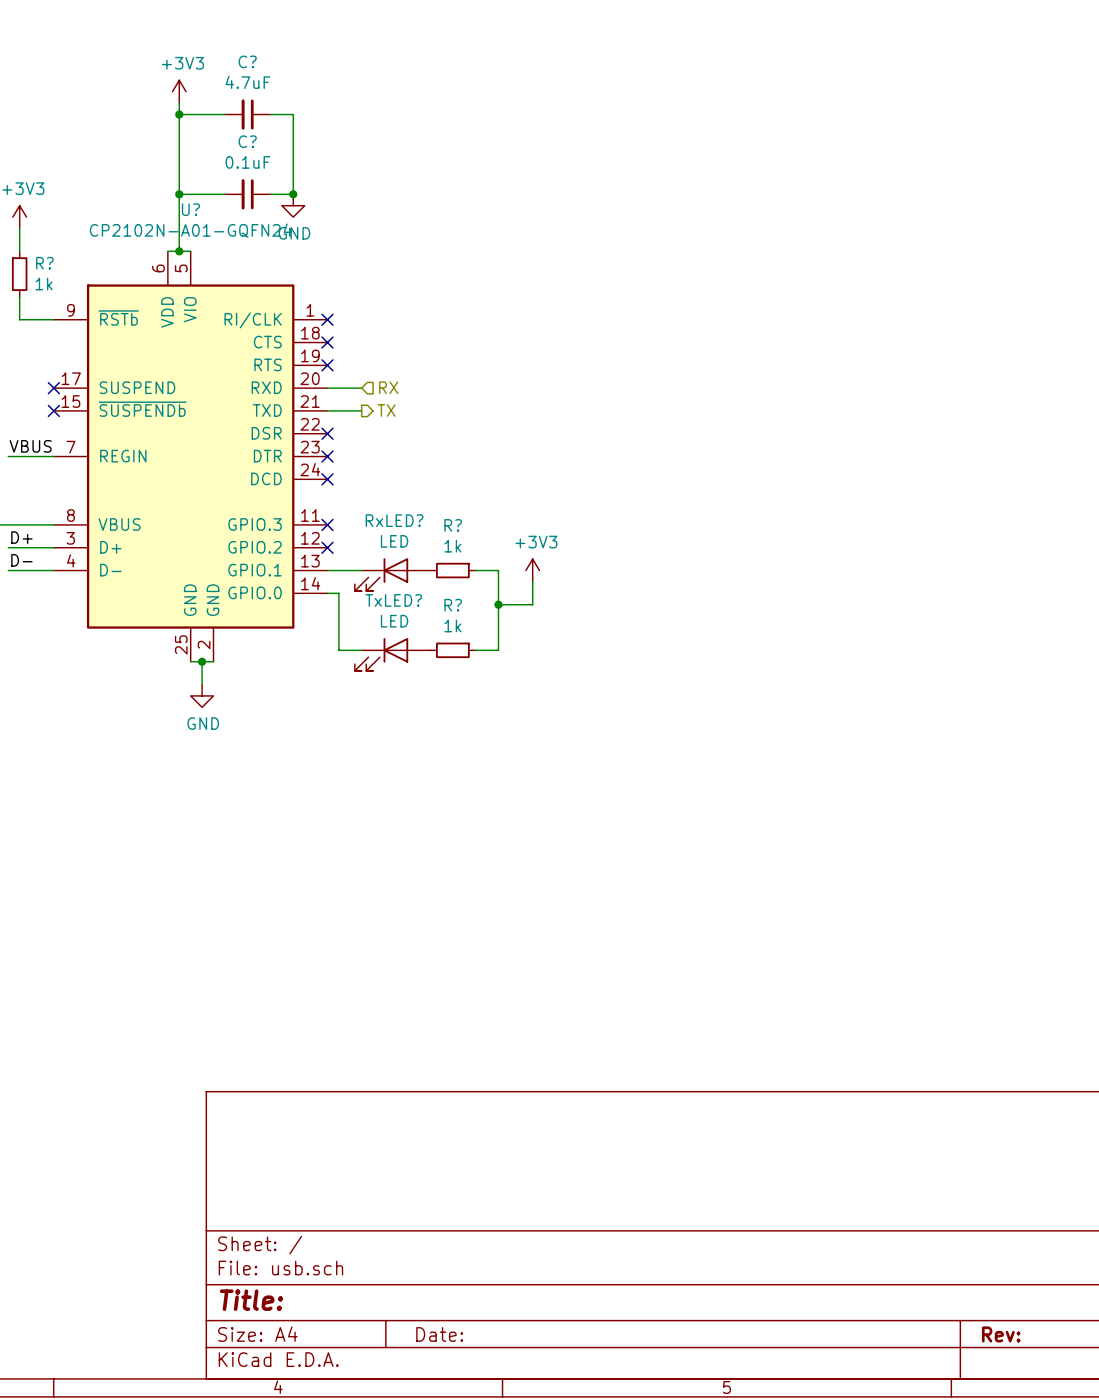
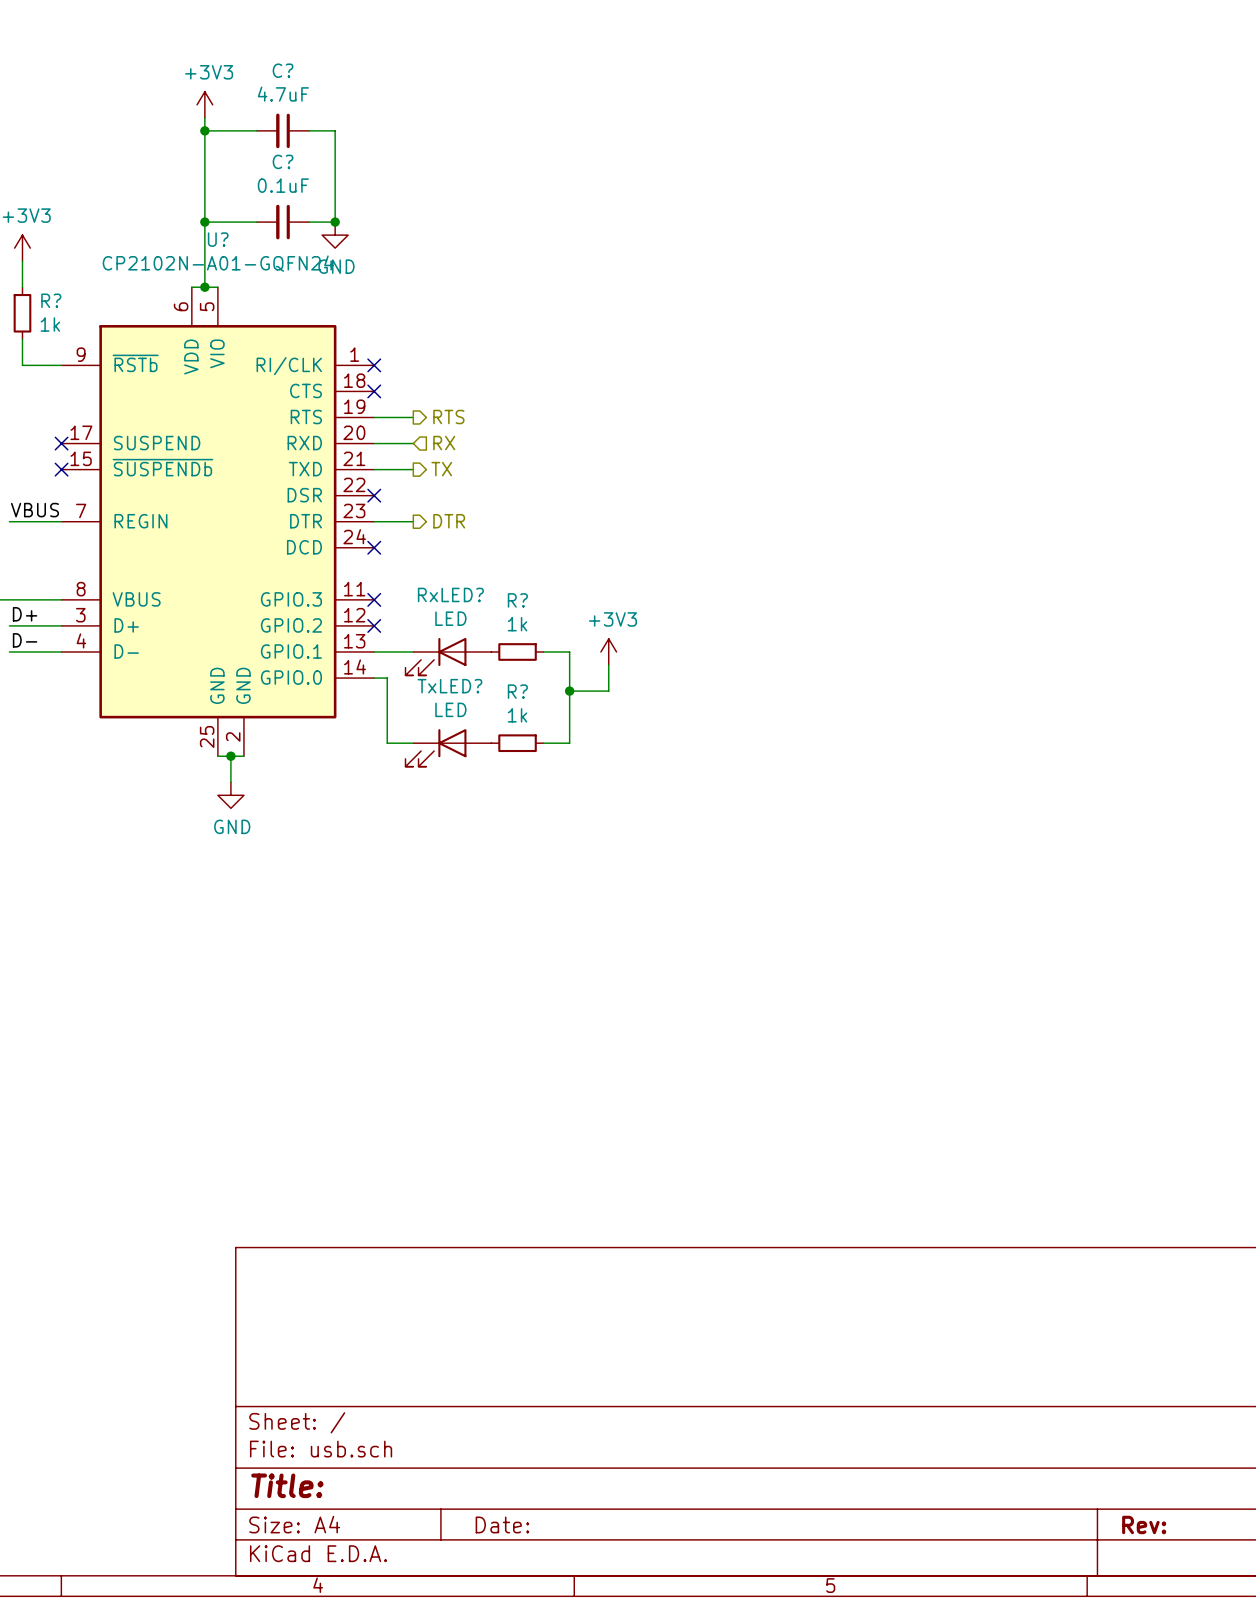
hierarchical label: none -> RTS (448, 417)
wire: none -> (374, 417) (413, 417)
no-connect mark: (327, 365) -> none
wire: none -> (374, 521) (413, 521)
no-connect mark: (327, 456) -> none
hierarchical label: none -> DTR (449, 521)

